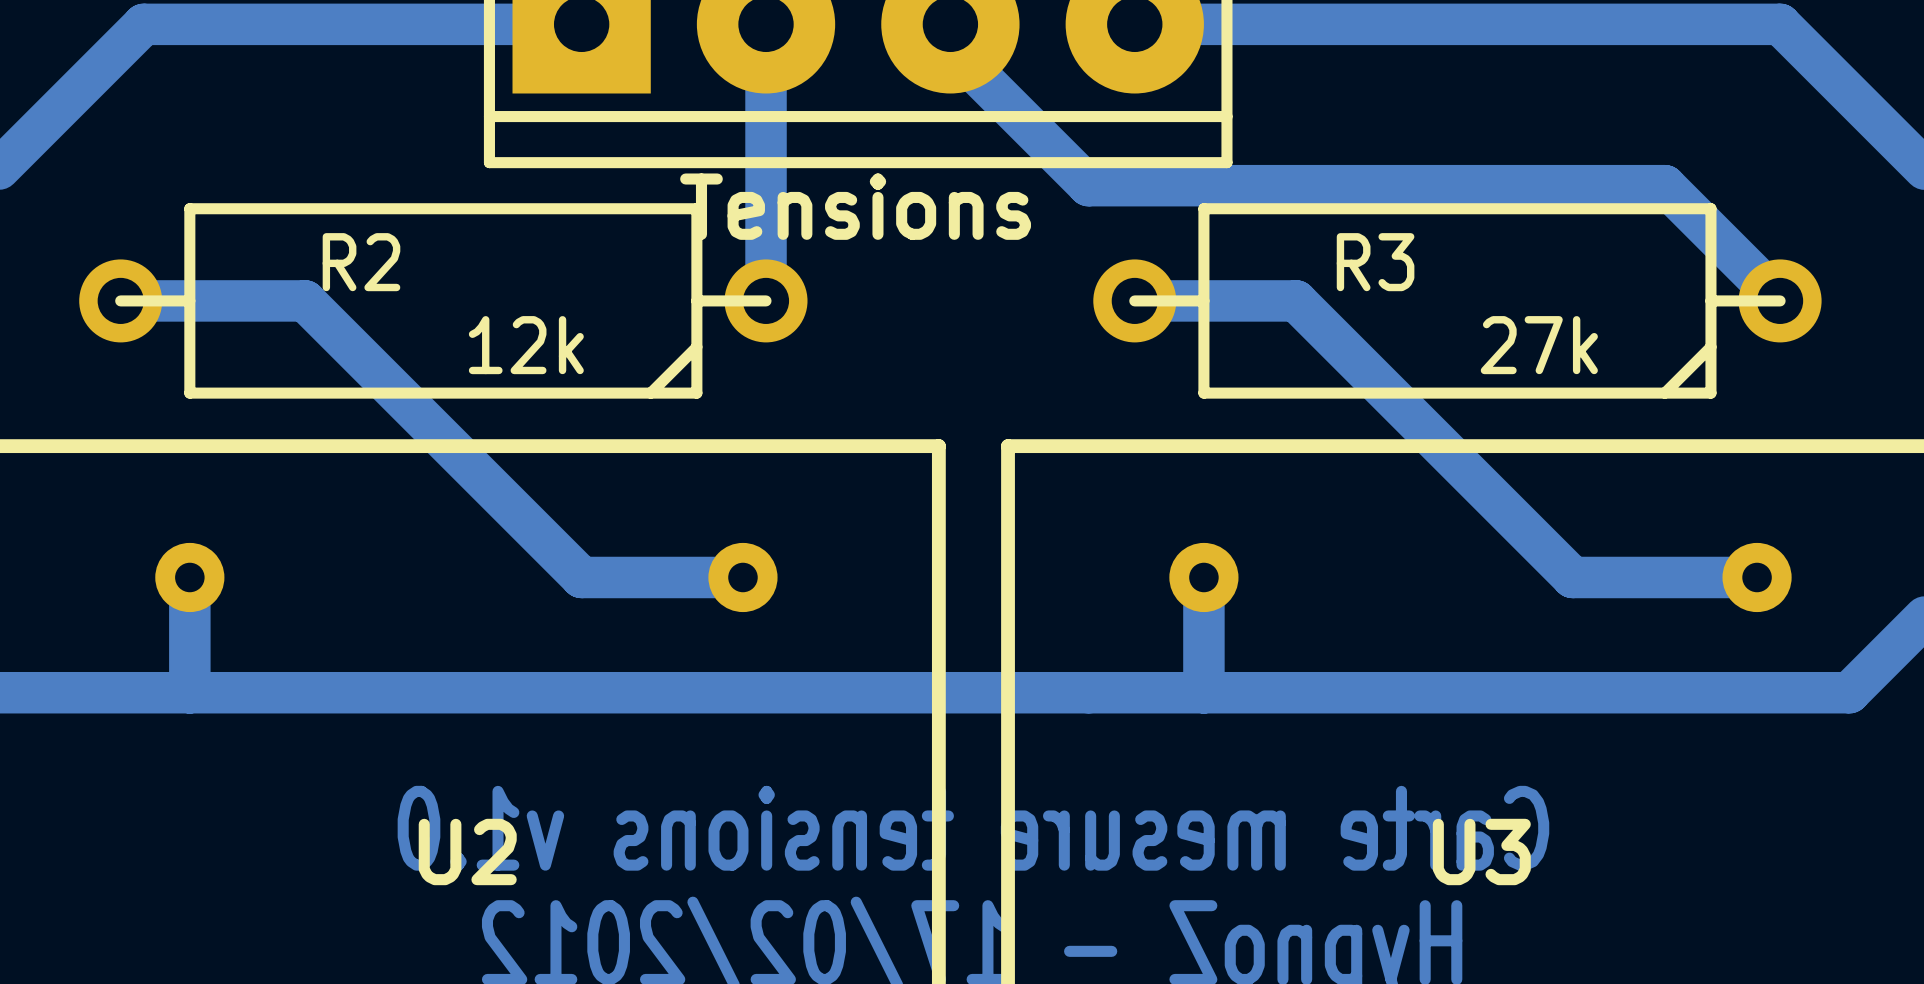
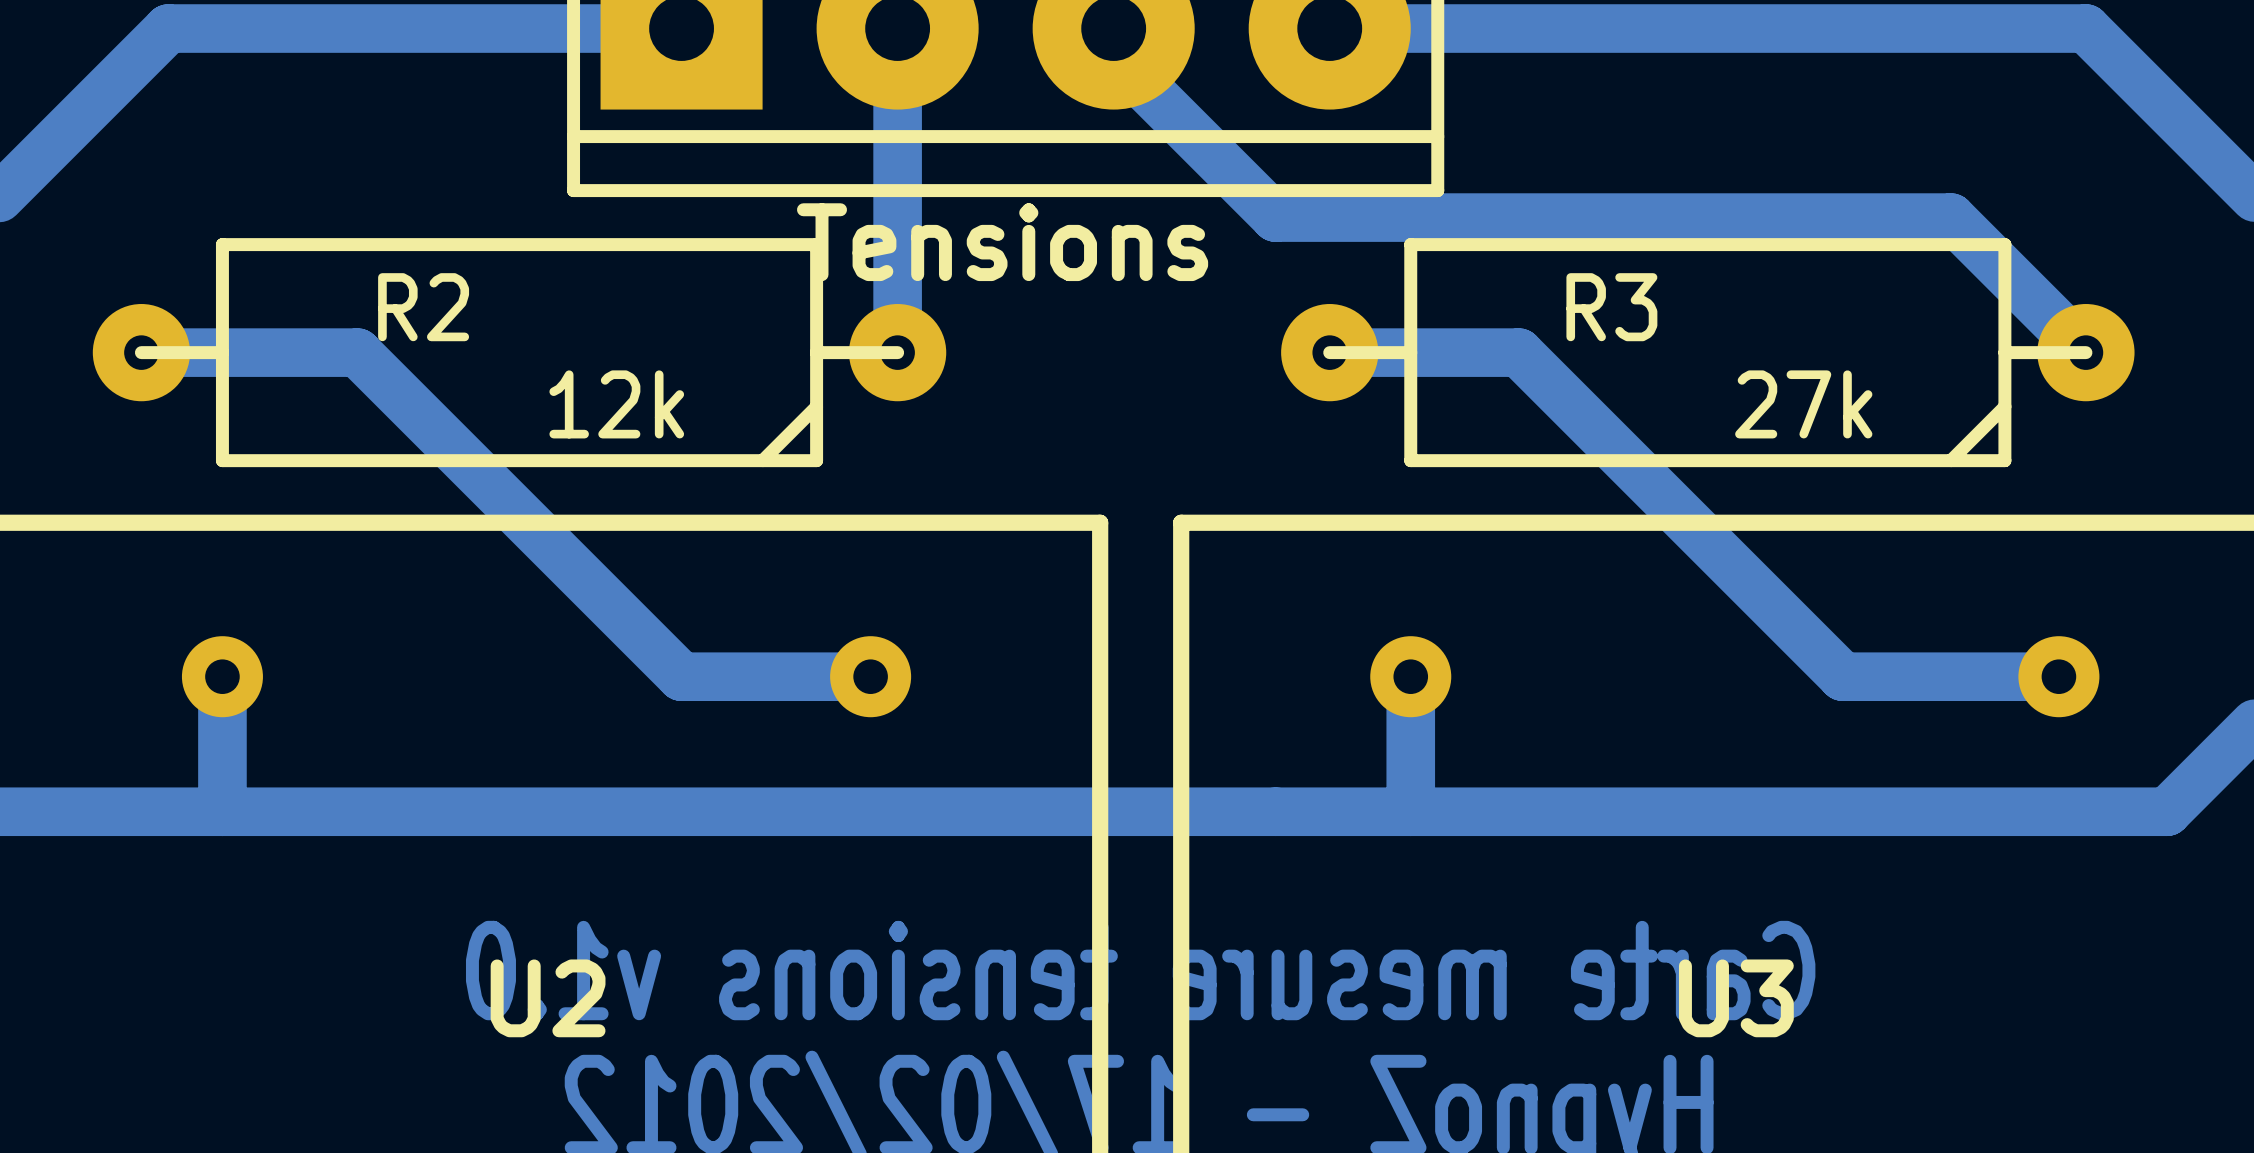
R2 footprint: [79, 203, 808, 399] -> [92, 238, 947, 468]
R3 footprint: [1093, 203, 1822, 399] -> [1281, 238, 2135, 468]

